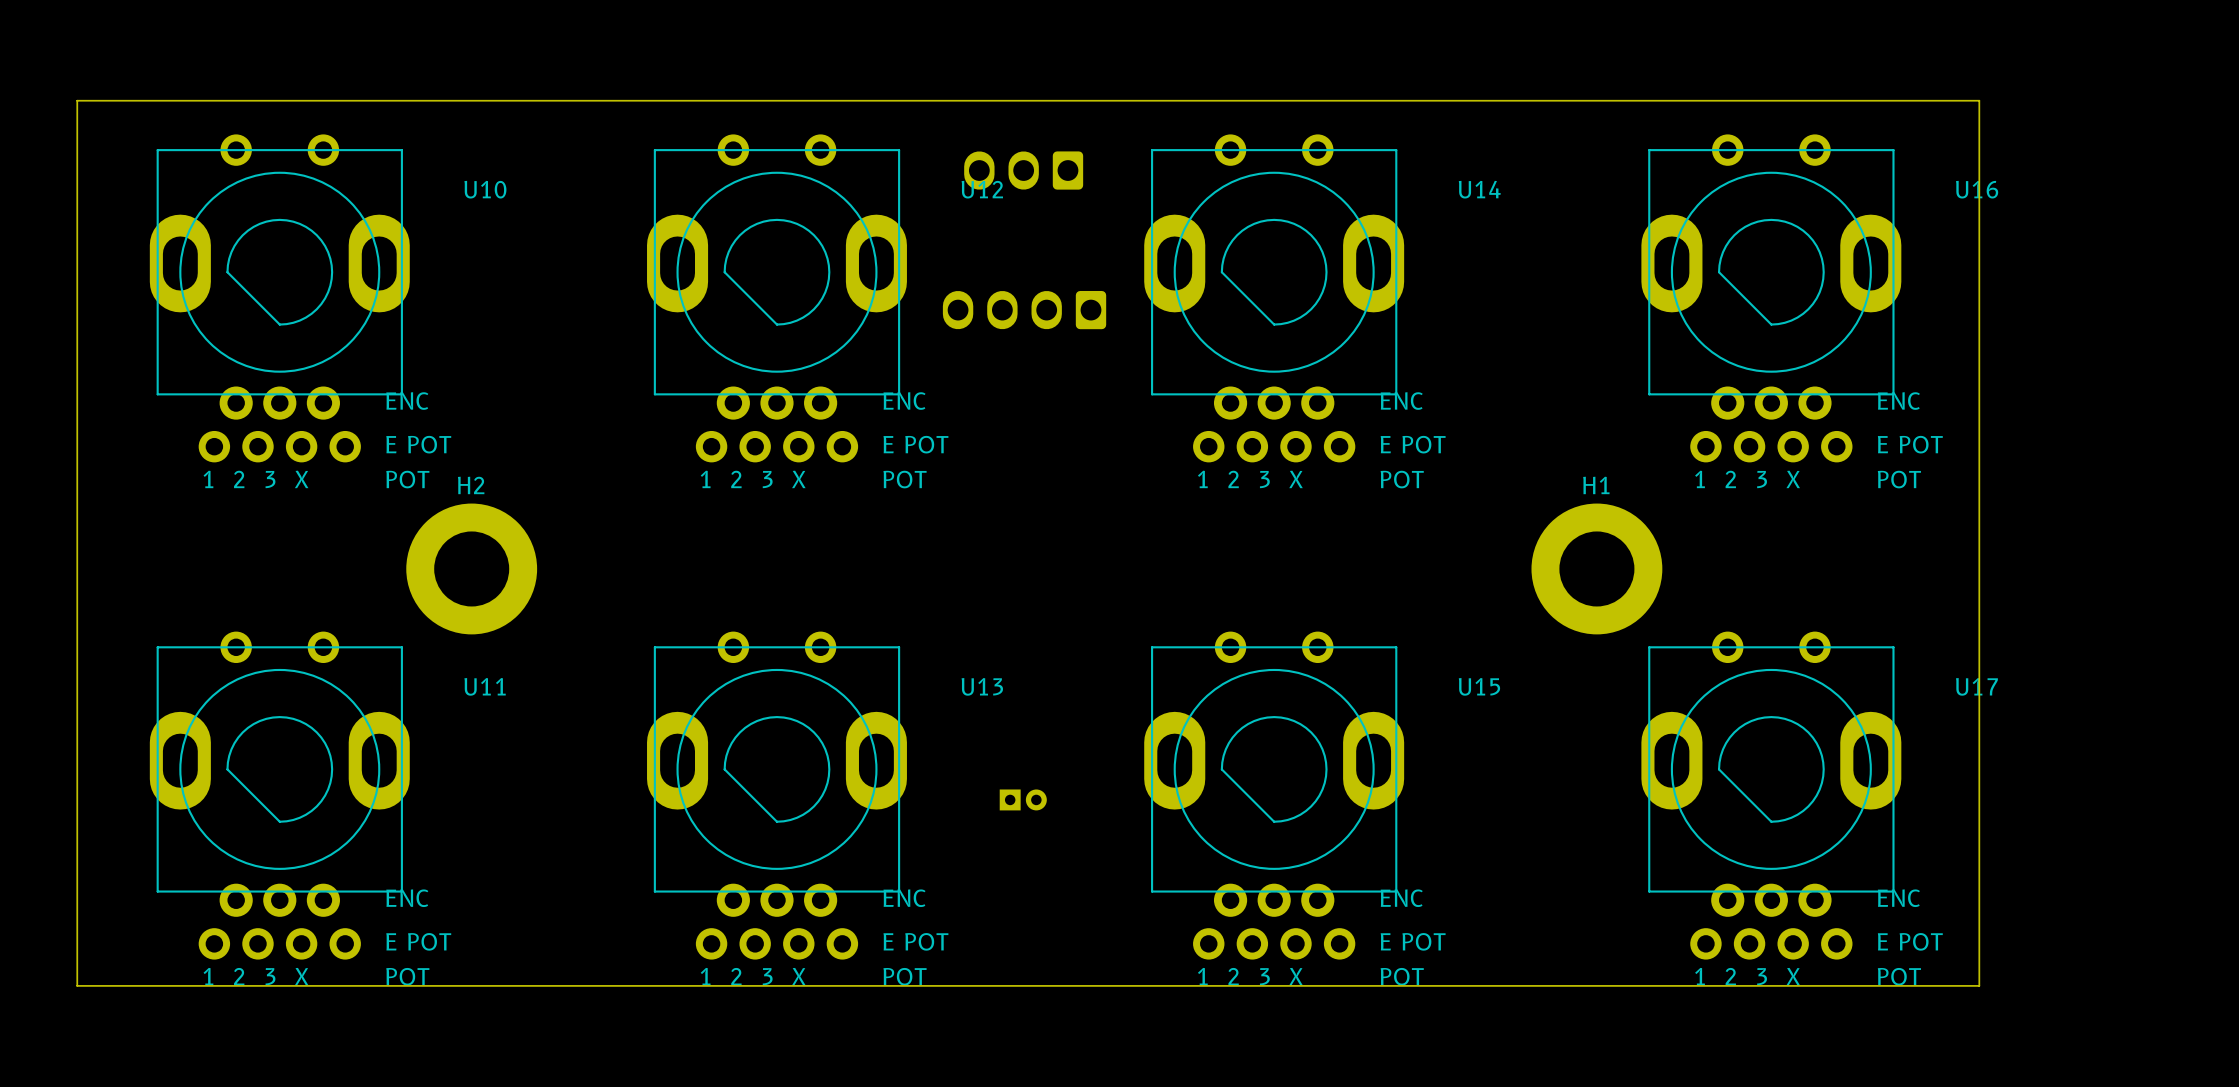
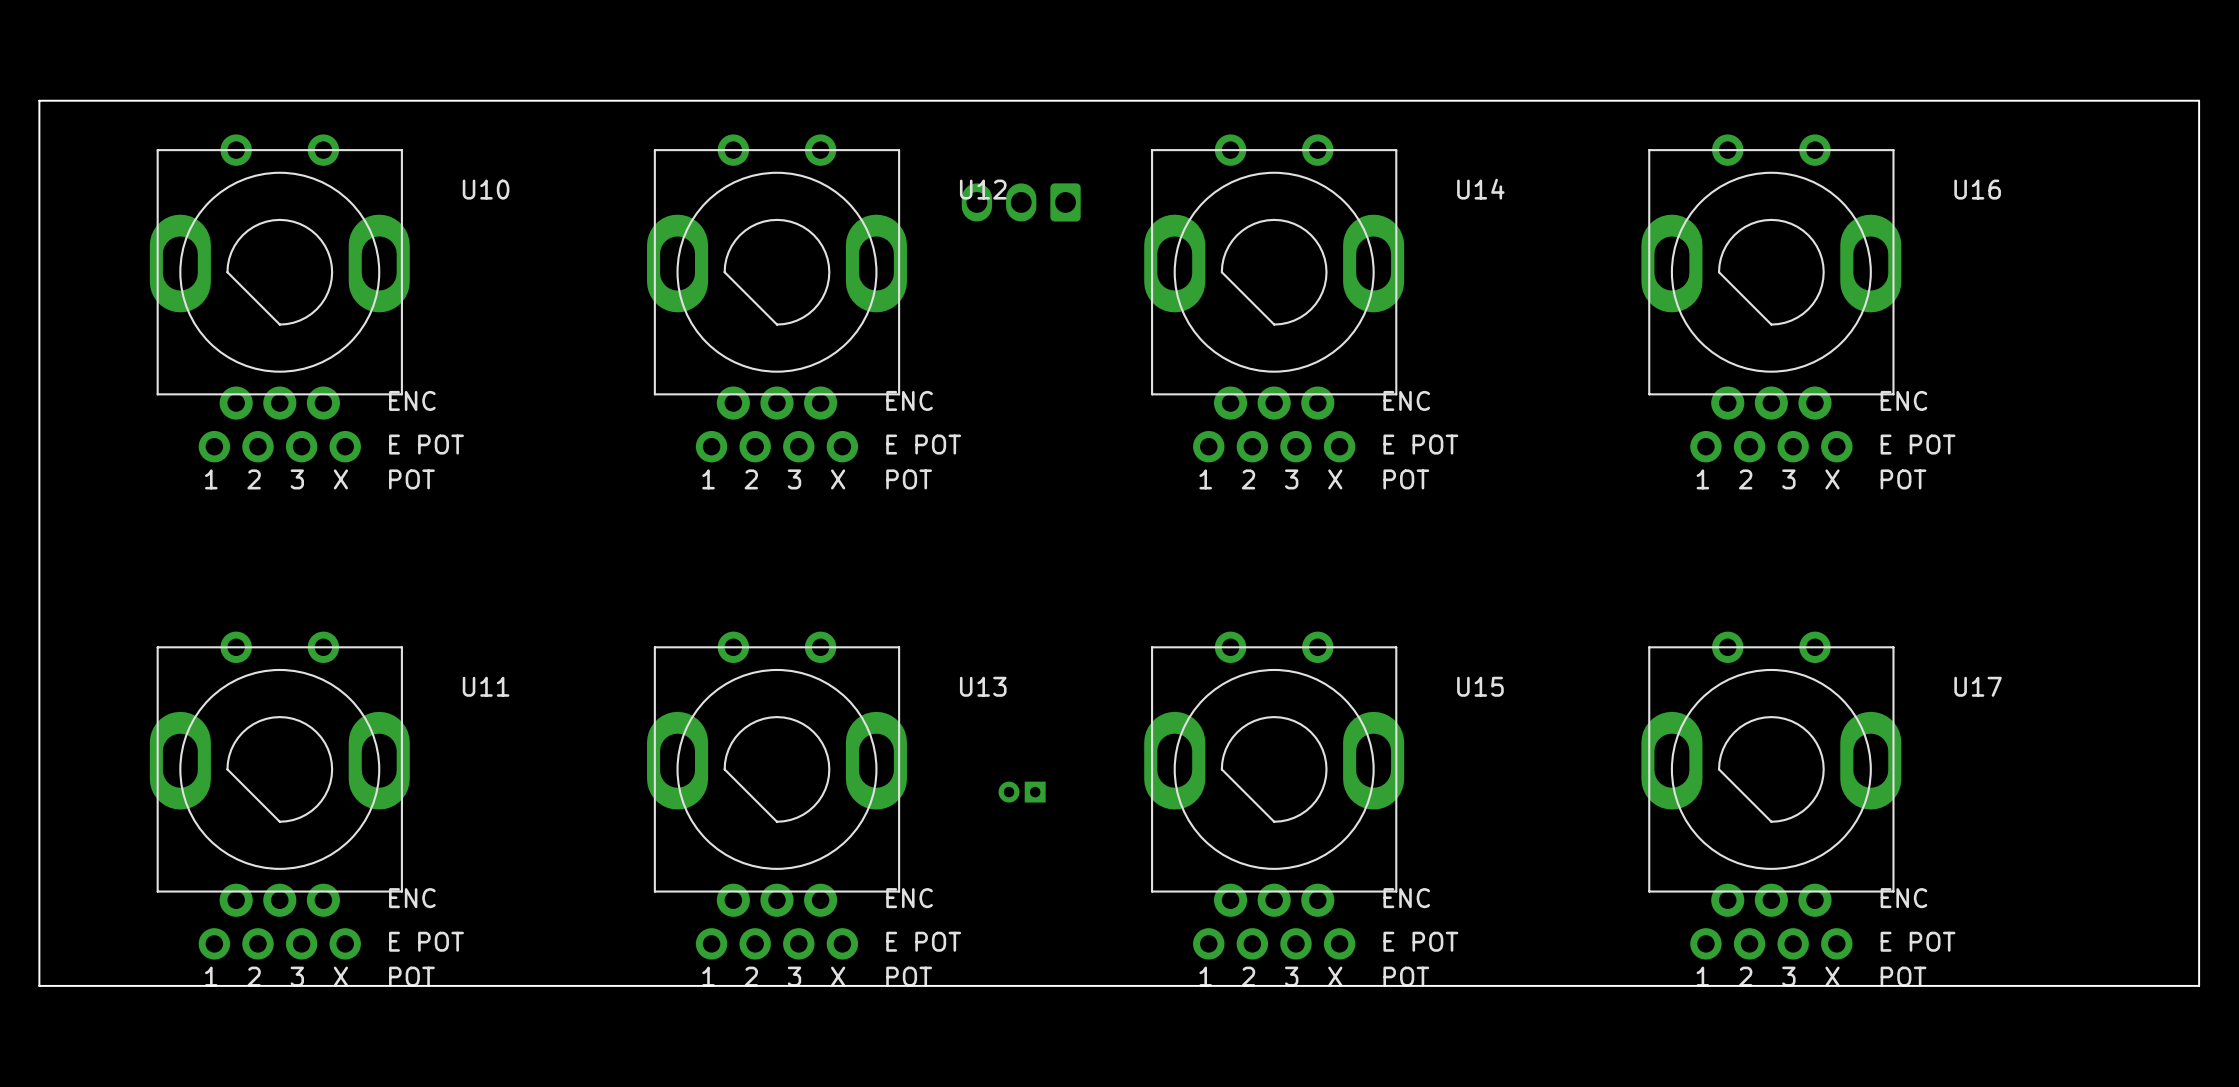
board edge: (77, 100) (77, 985) -> (77, 100) (39, 100) (39, 985) (77, 985)
board edge: (1979, 100) (1979, 985) -> (1979, 100) (2199, 100) (2199, 985) (1979, 985)
part position: (1023, 170) -> (1021, 202)
part: (1024, 310) -> none
H2: (471, 568) -> none
H1: (1596, 568) -> none
part rotation: 0° (1023, 799) -> 180° (1022, 792)

